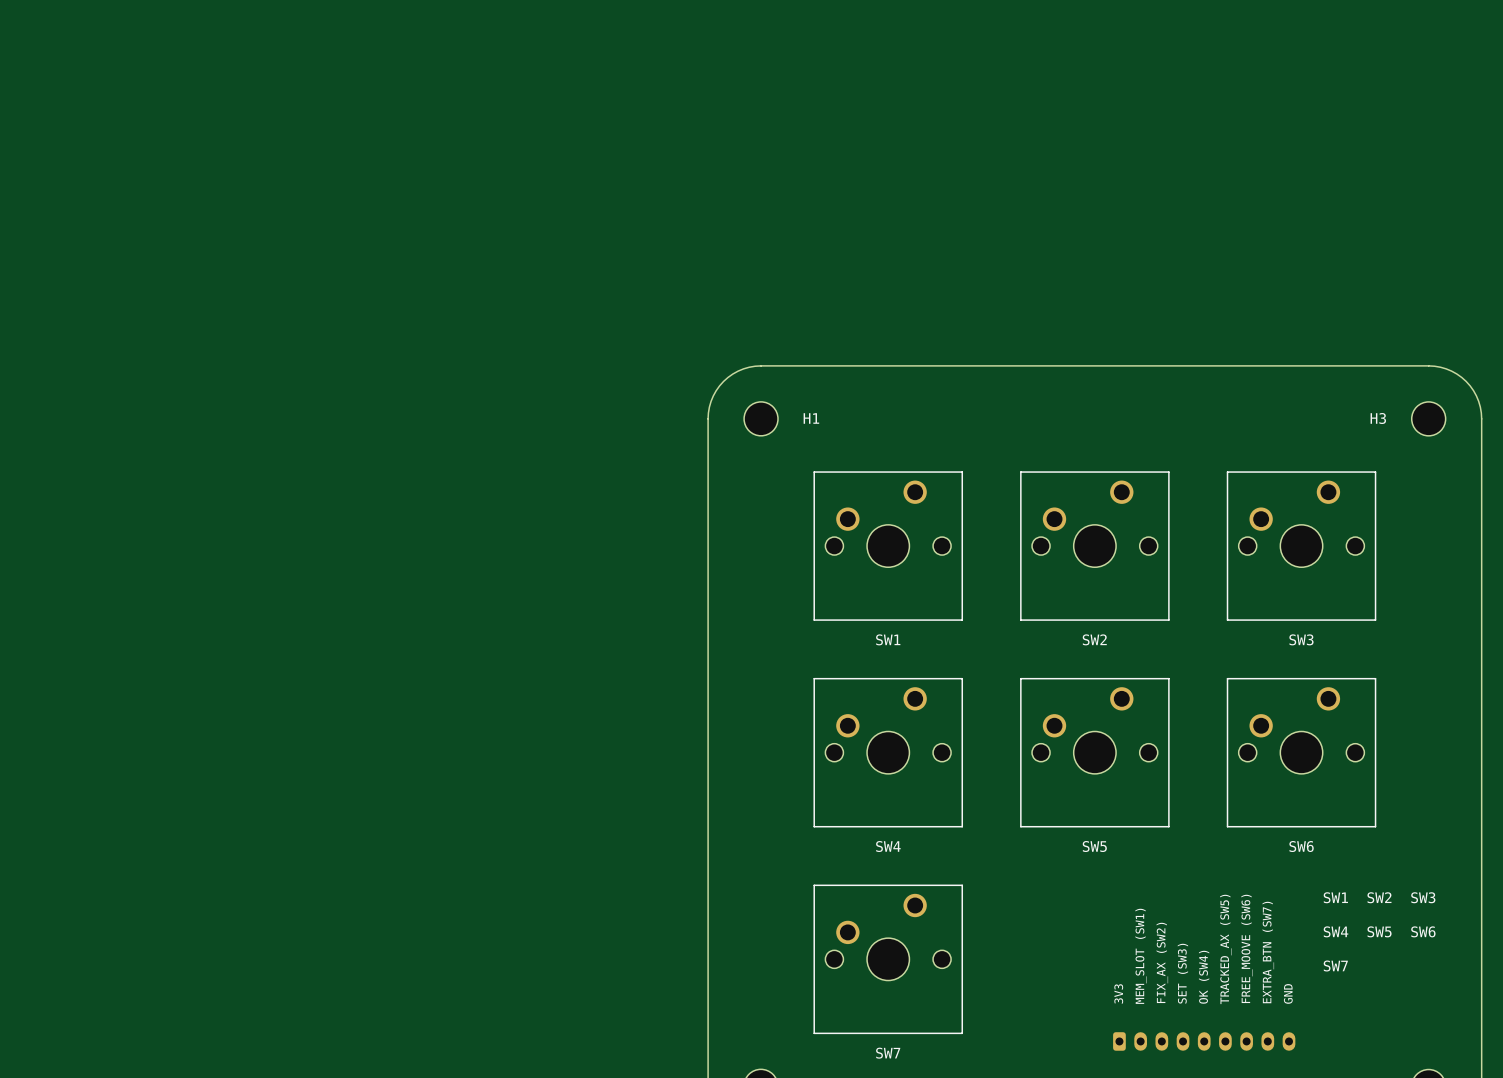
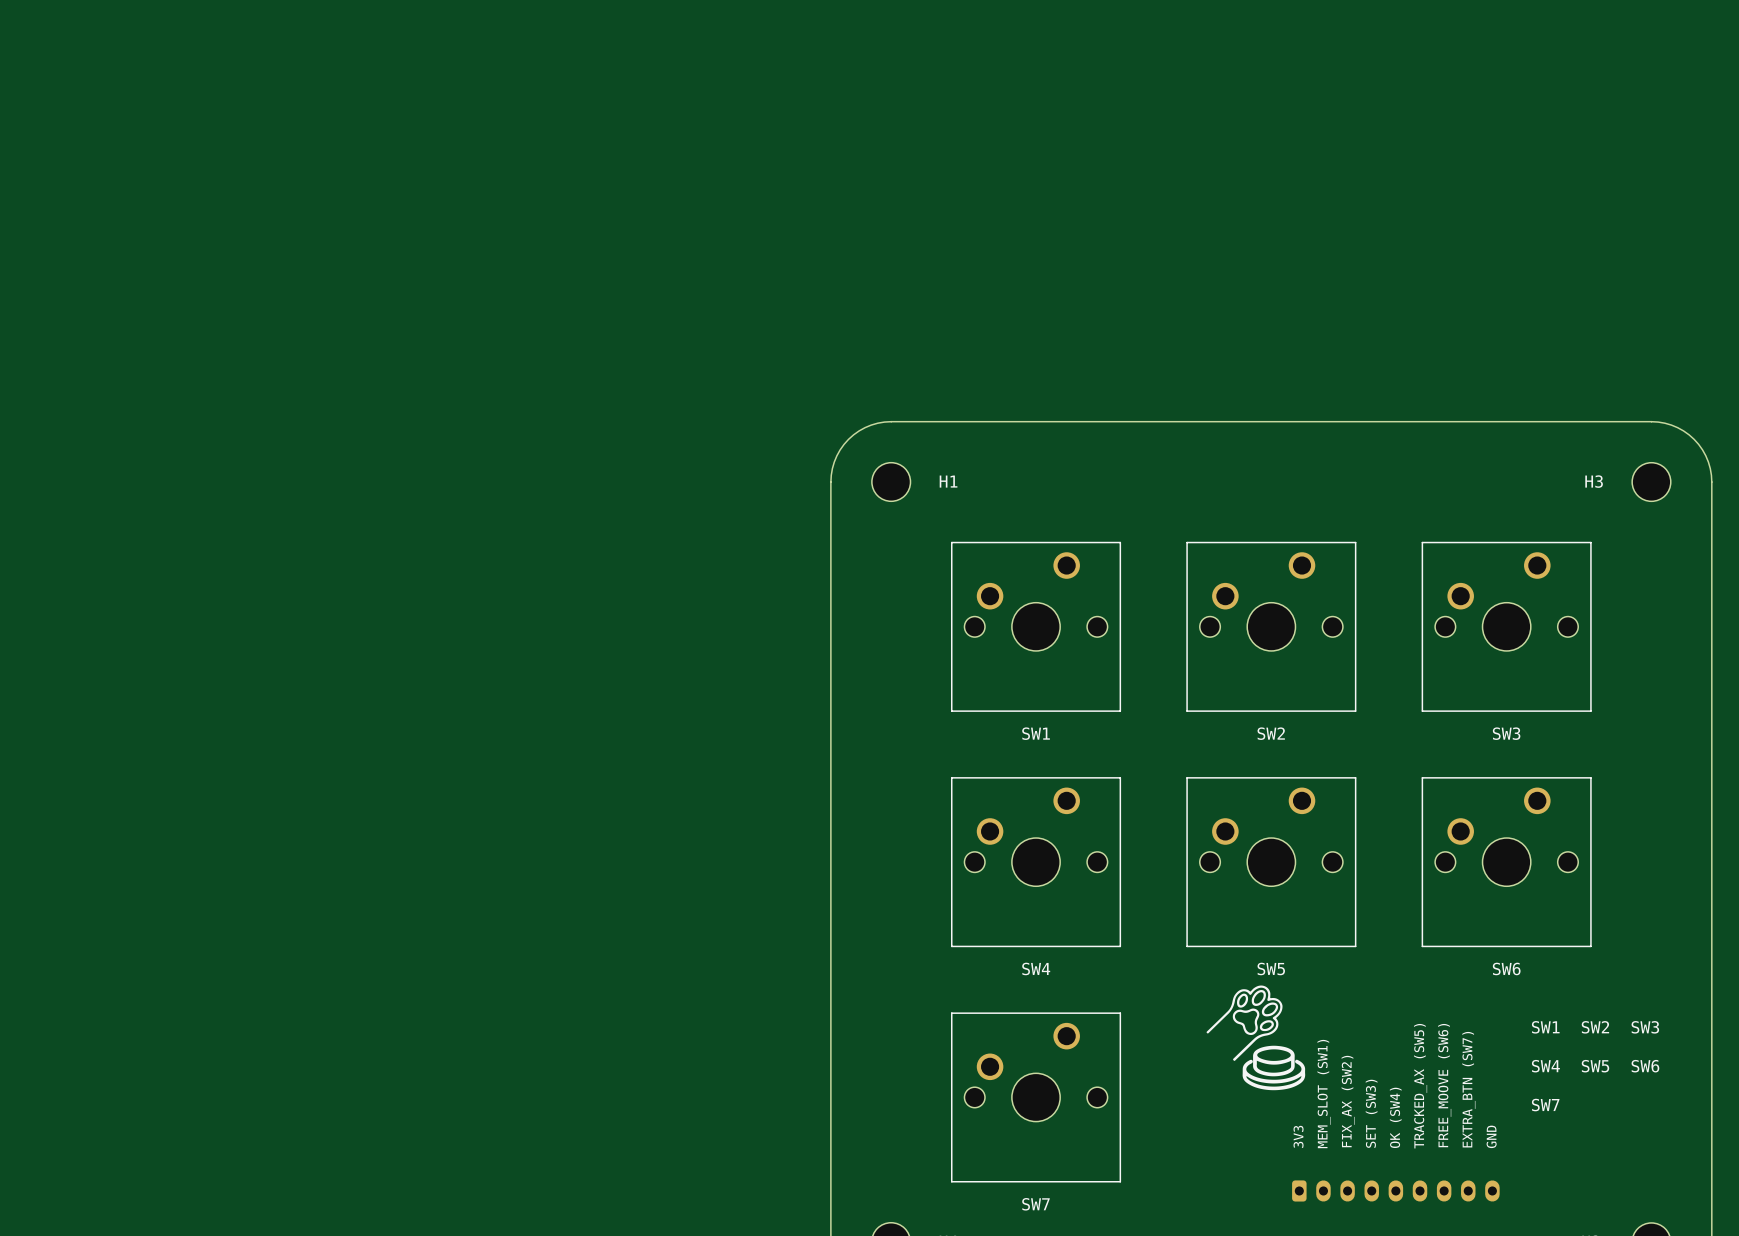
drawing: none -> [1206, 985, 1306, 1091]

